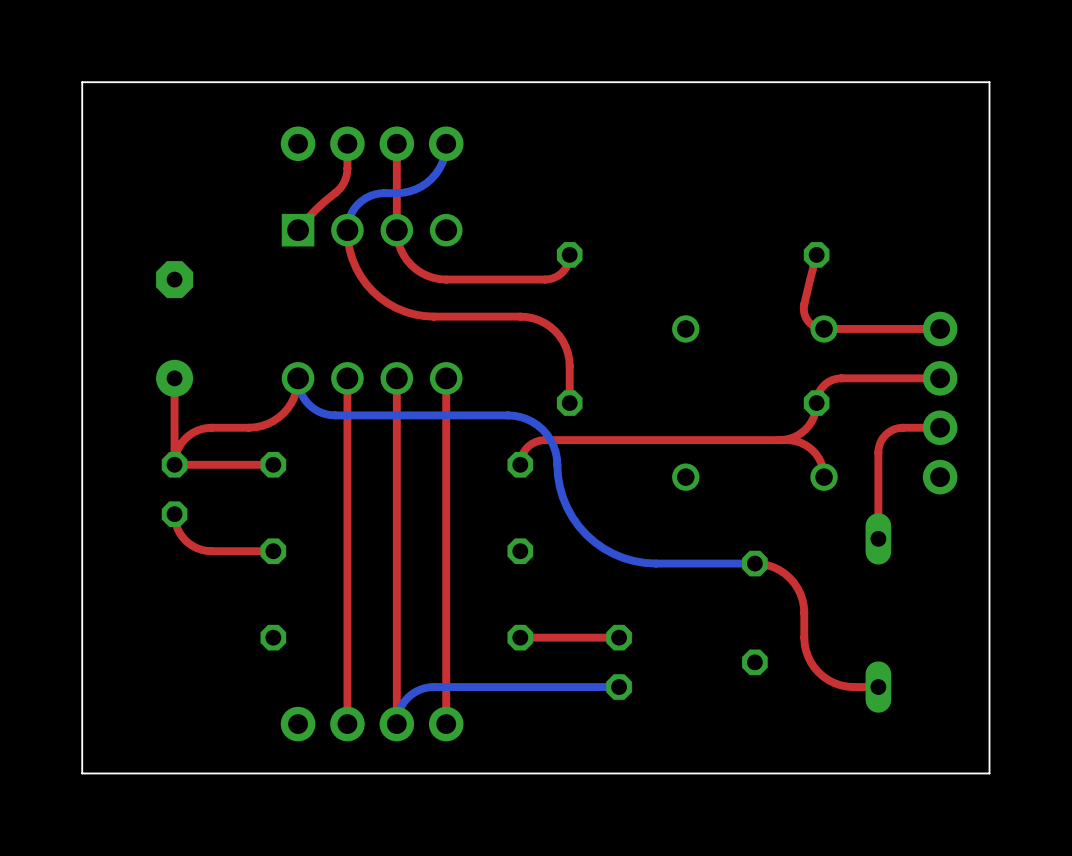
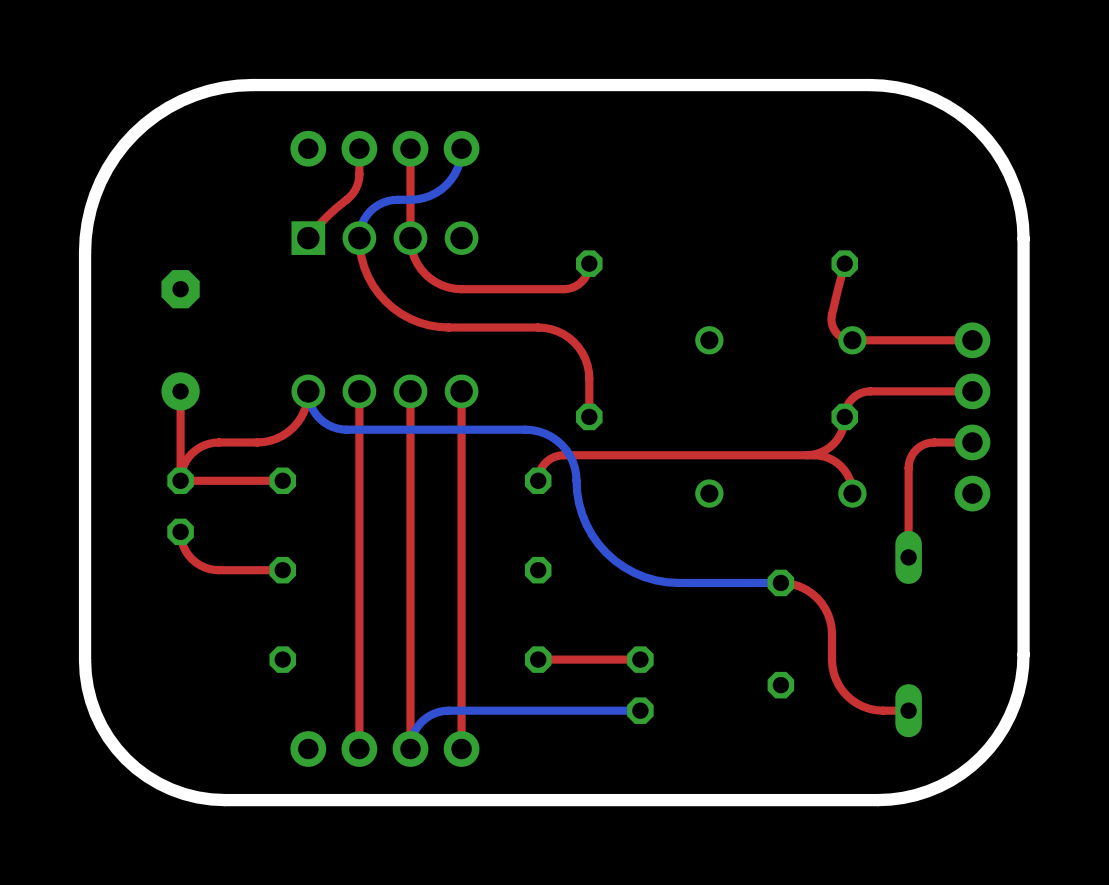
board edge: (243, 82) (82, 82) (82, 243) -> (252, 85) (209, 90) (181, 100) (156, 115) (134, 134) (115, 156) (100, 181) (90, 209) (85, 252)
board edge: (840, 82) (989, 82) (989, 230) -> (869, 85) (896, 87) (922, 94) (946, 105) (978, 130) (1002, 161) (1014, 186) (1021, 212) (1023, 238)
board edge width: thin (840, 82) (243, 82) -> thick (869, 85) (252, 85)
board edge width: thin (989, 230) (989, 632) -> thick (1023, 238) (1023, 654)
board edge width: thin (82, 243) (82, 638) -> thick (85, 252) (85, 660)
board edge: (989, 632) (989, 773) (848, 773) -> (1023, 654) (1021, 679) (1014, 704) (1004, 727) (980, 757) (950, 780) (927, 791) (903, 797) (877, 800)
board edge: (82, 638) (82, 773) (217, 773) -> (85, 660) (87, 687) (95, 713) (108, 737) (126, 759) (147, 776) (171, 789) (197, 797) (224, 800)
board edge width: thin (848, 773) (217, 773) -> thick (877, 800) (224, 800)

